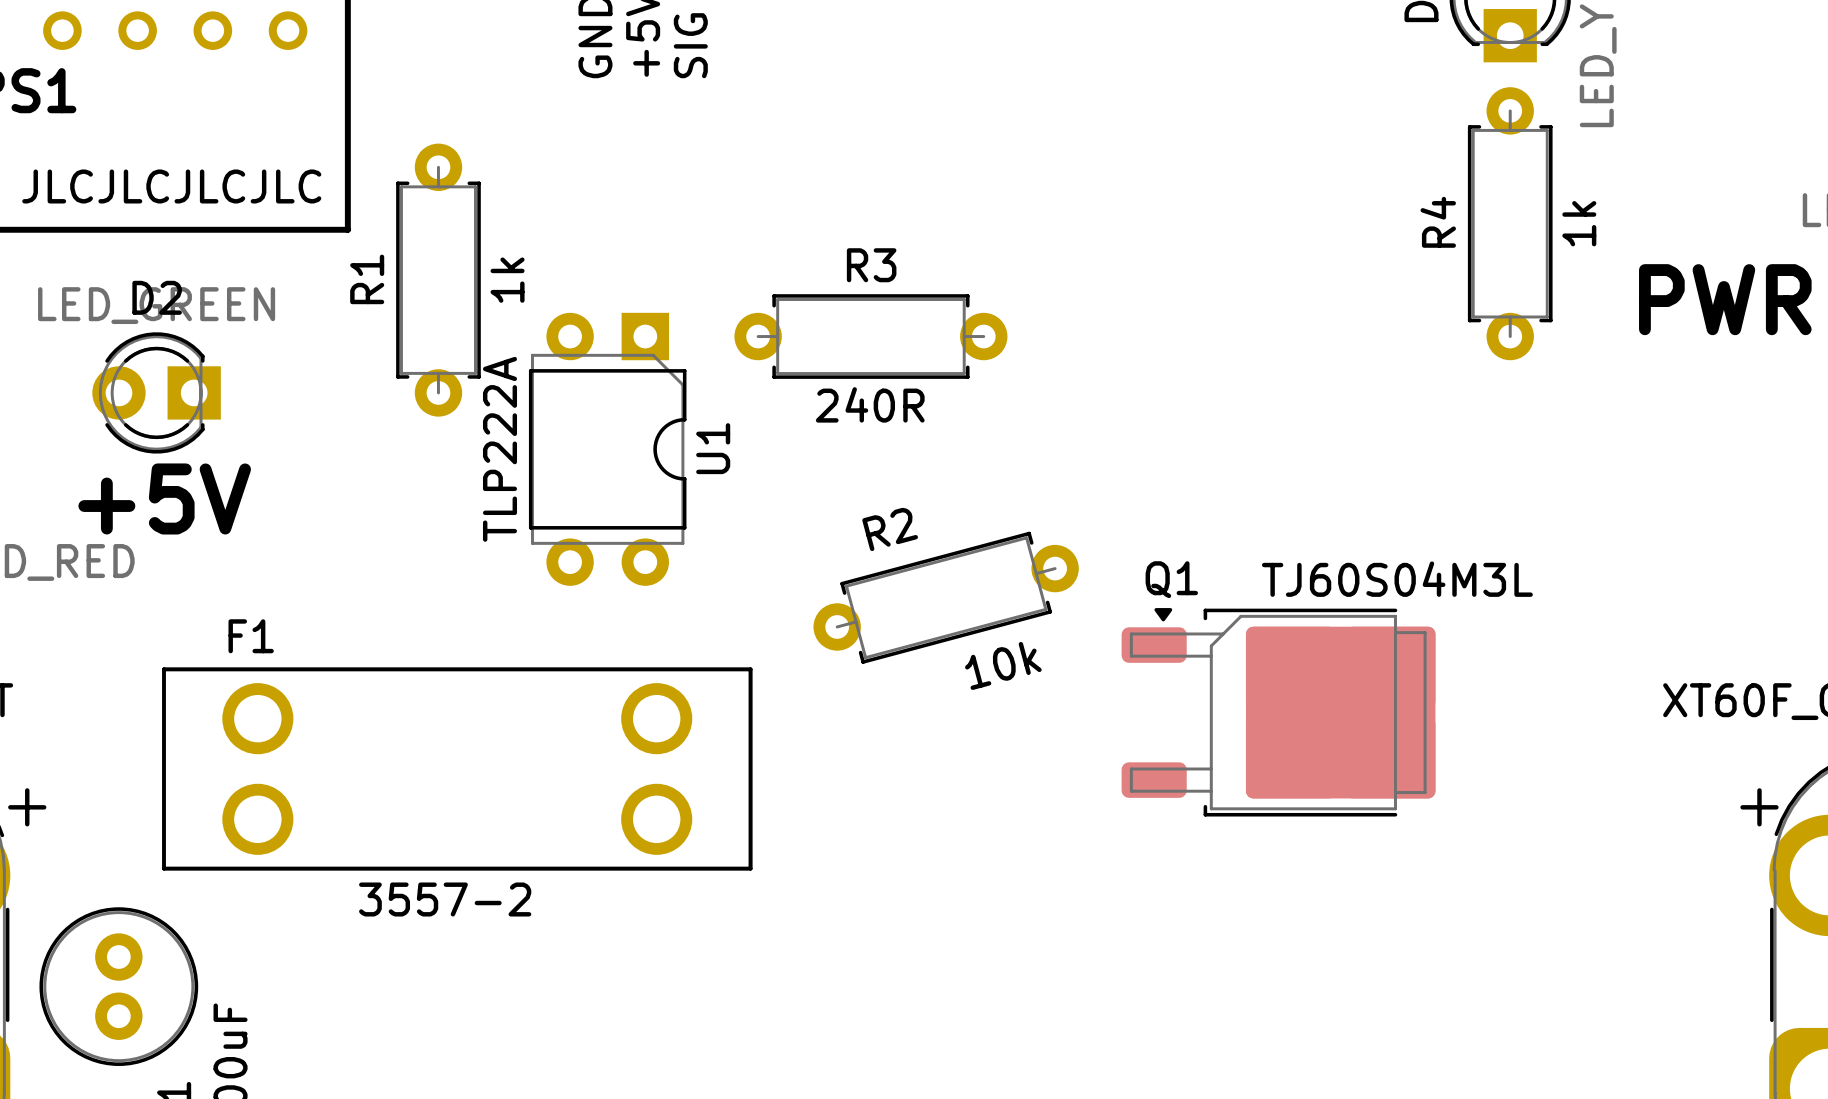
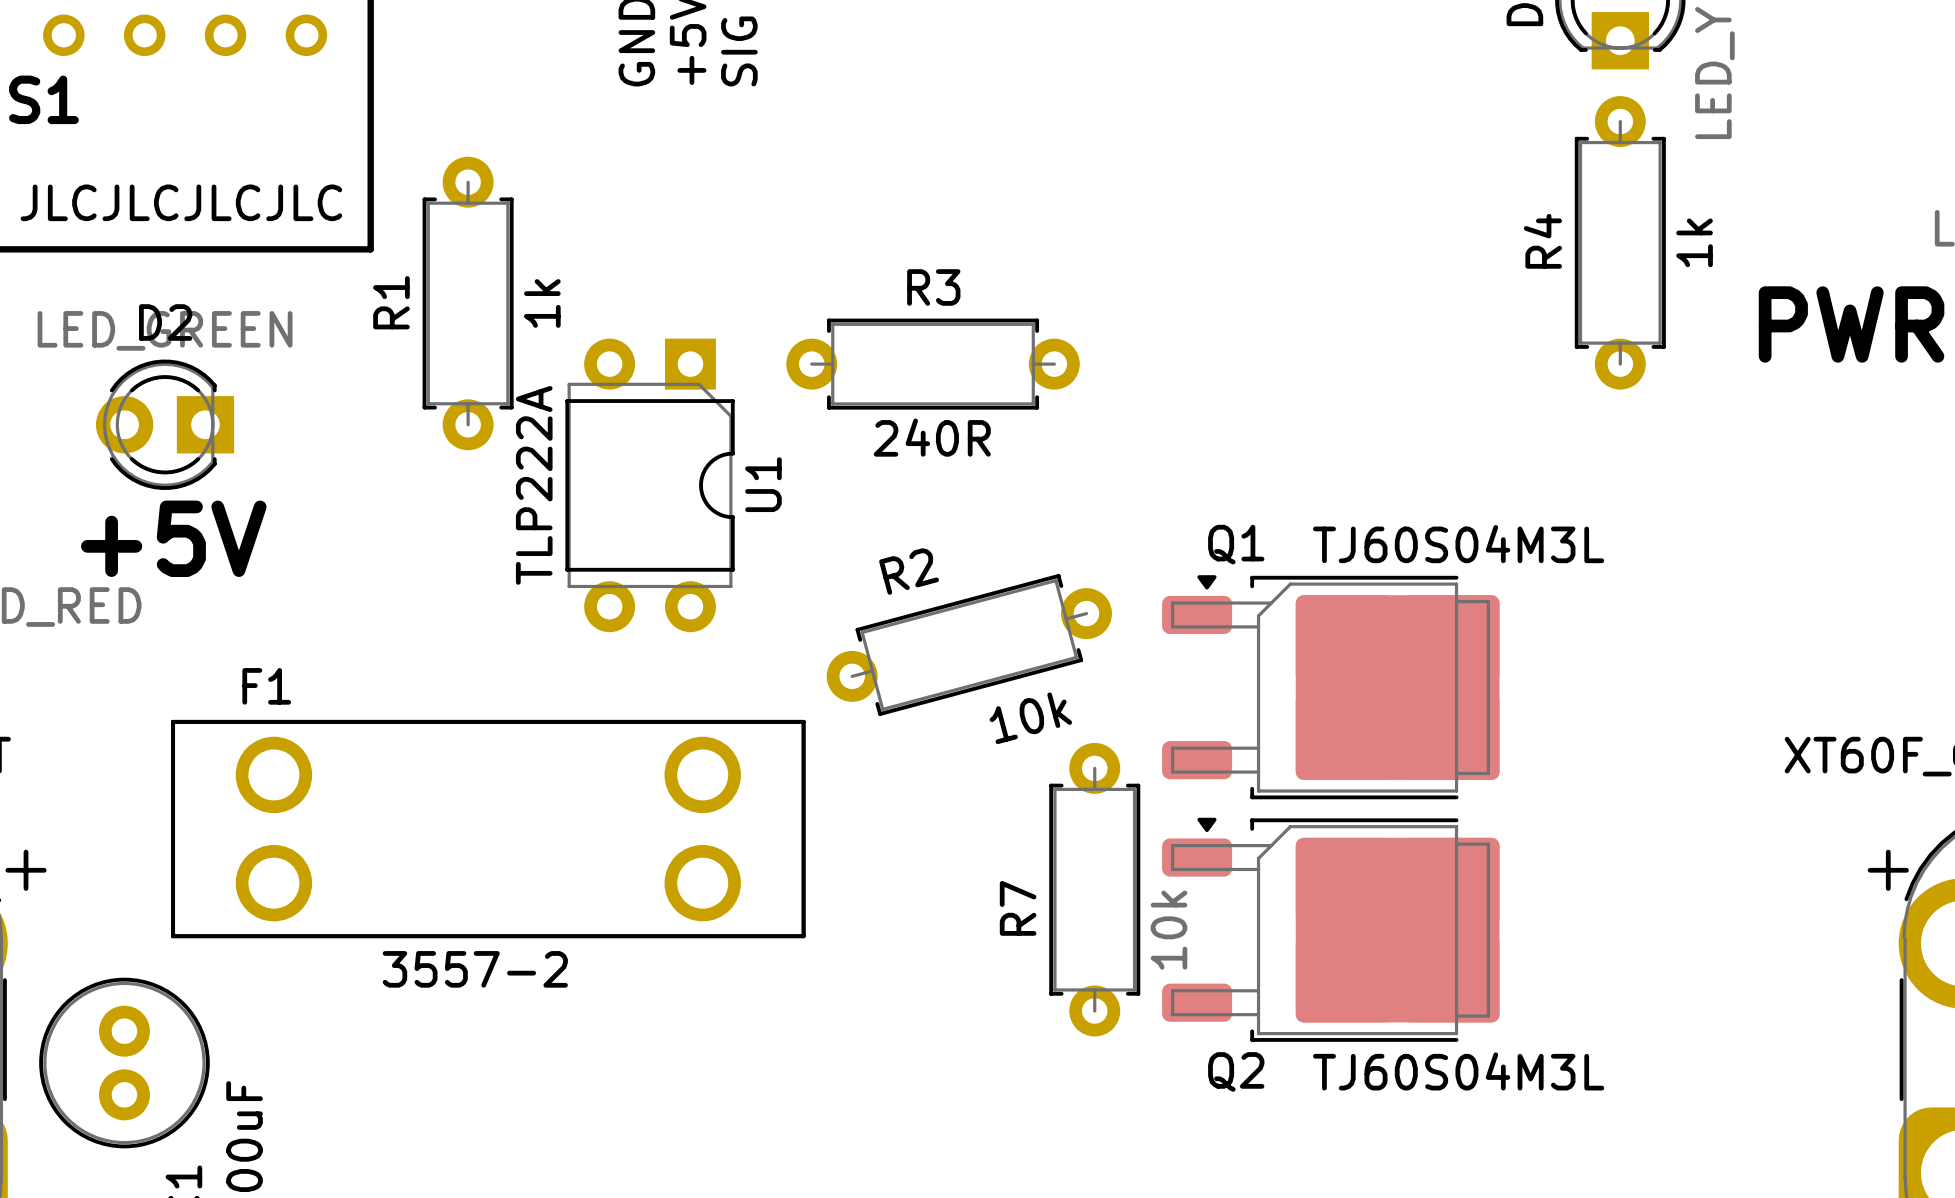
Q1 name position: Q1 (1171, 579) -> Q1 (1236, 544)
R2 position: (946, 597) -> (969, 644)
Q1 position: (1278, 712) -> (1330, 687)
R7: none -> 10k (1094, 889)
Q2: none -> TJ60S04M3L (1330, 929)

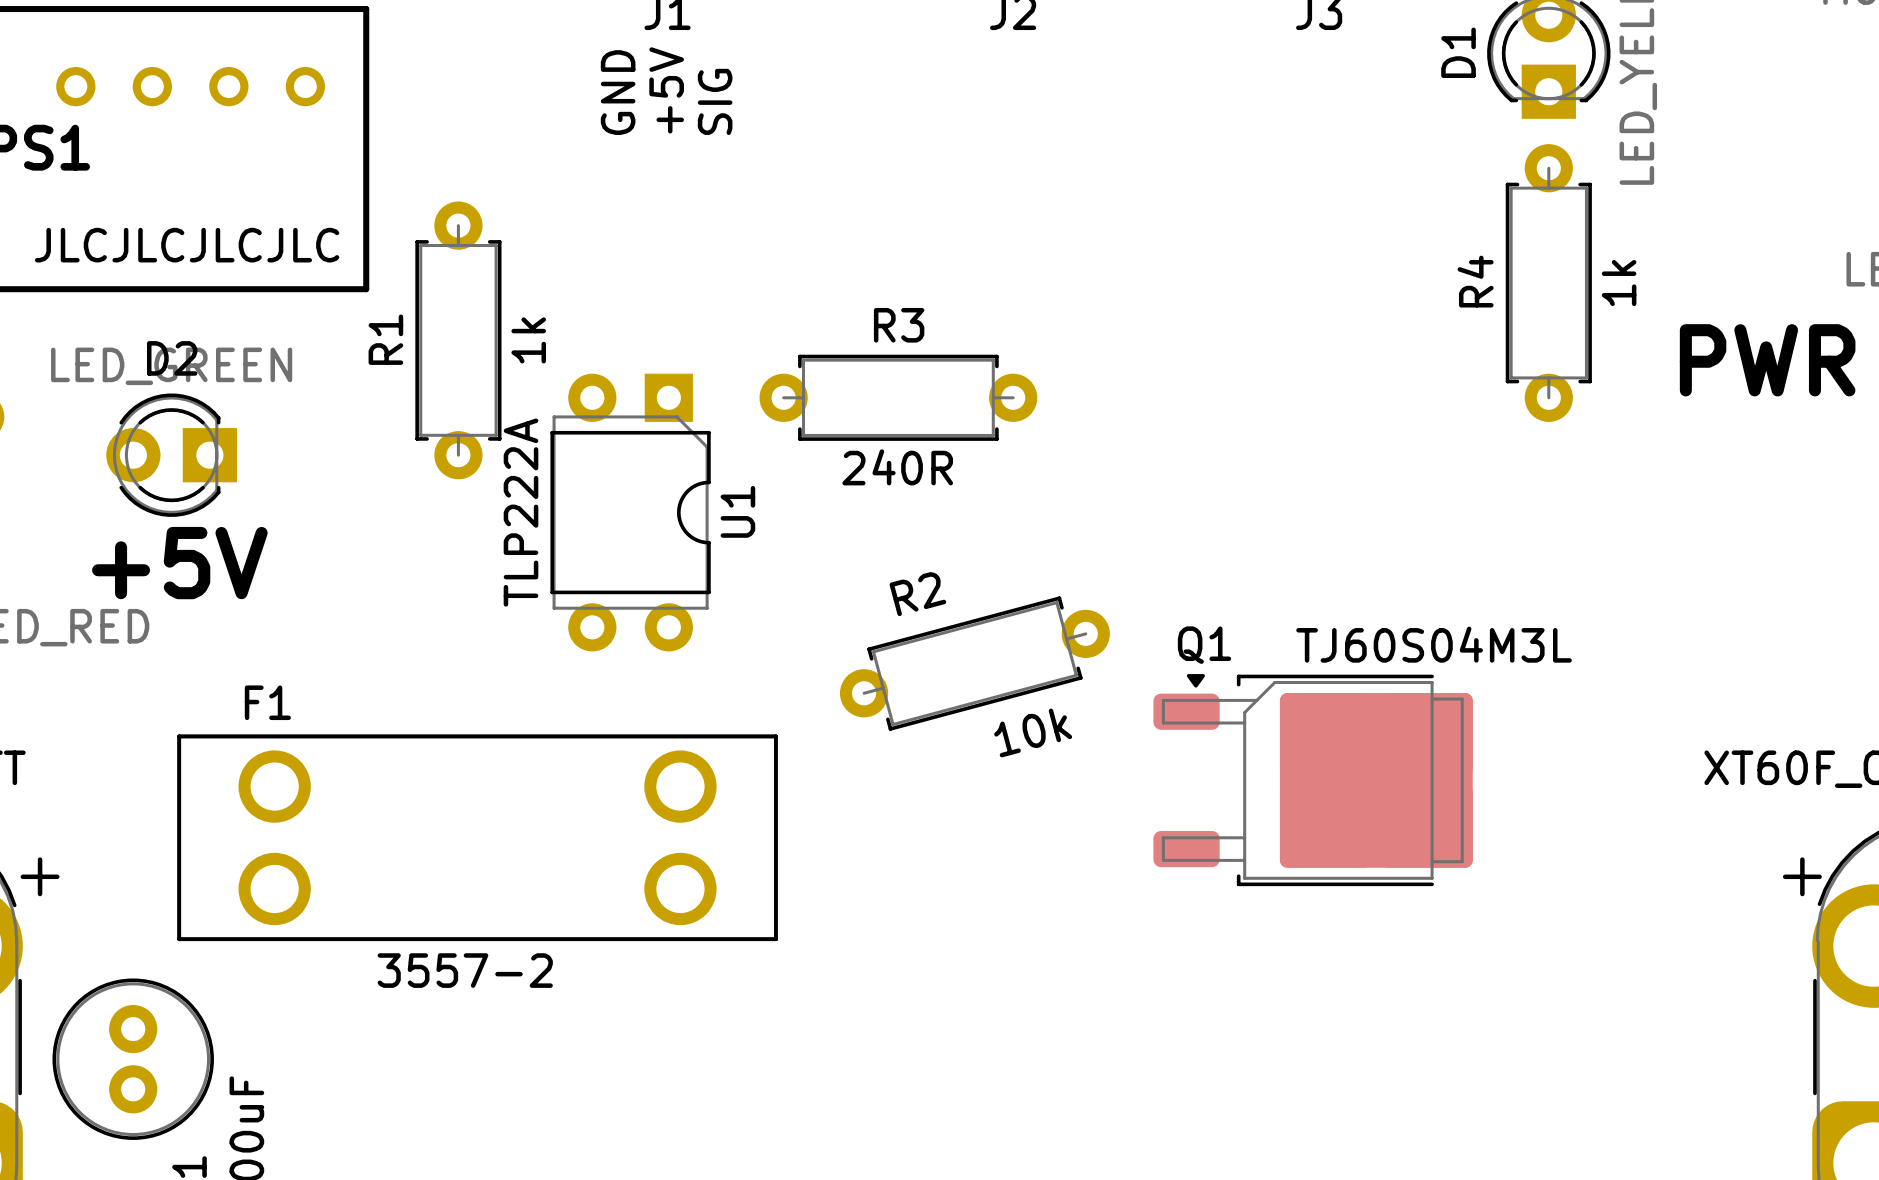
Q1 name position: Q1 (1236, 544) -> Q1 (1204, 645)
R2 position: (969, 644) -> (974, 663)
Q1 position: (1330, 687) -> (1313, 780)
R7: 10k (1094, 889) -> none
Q2: TJ60S04M3L (1330, 929) -> none

